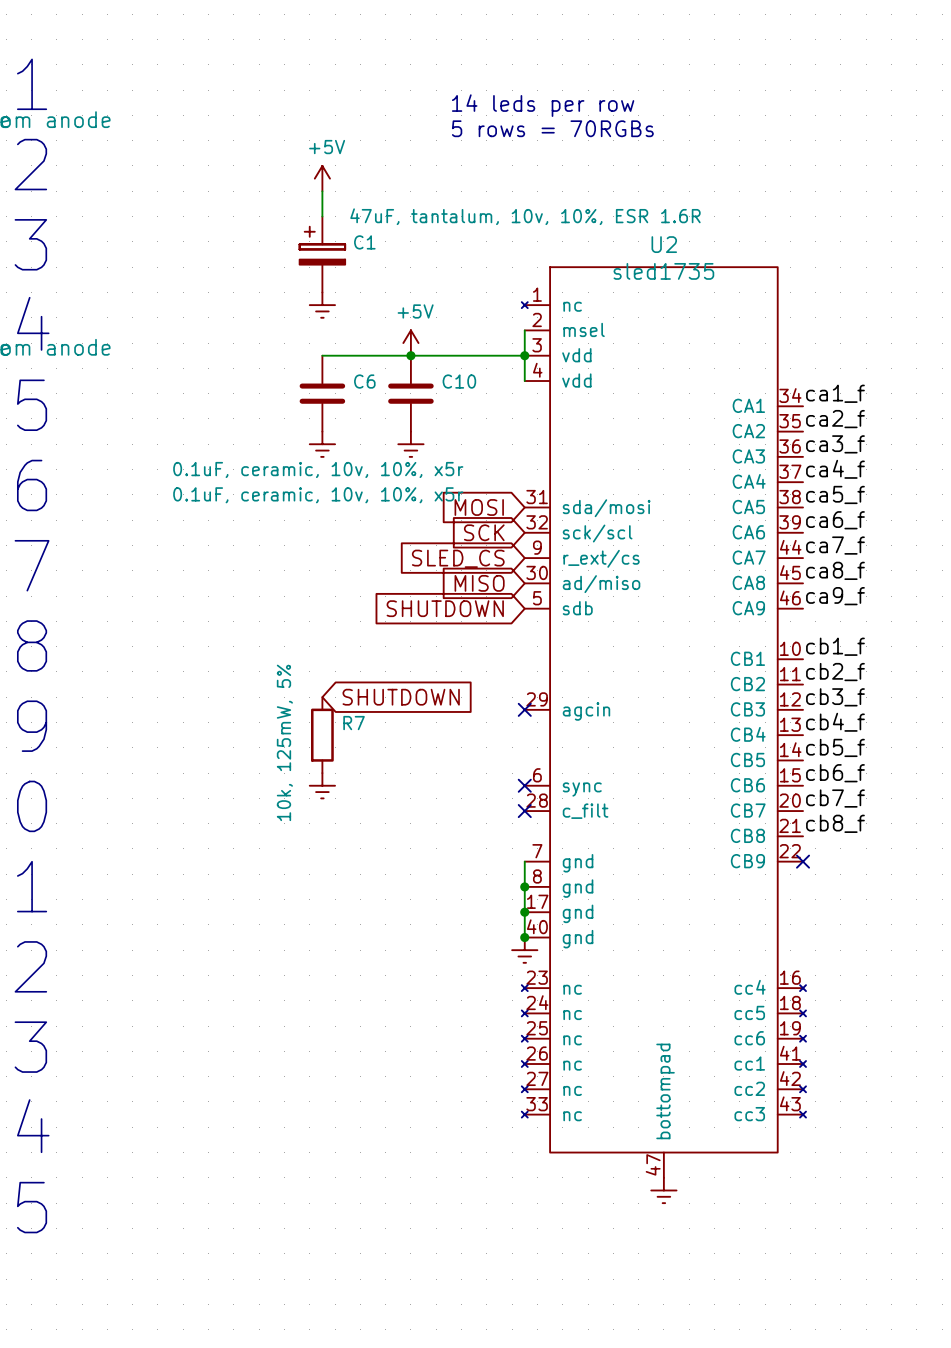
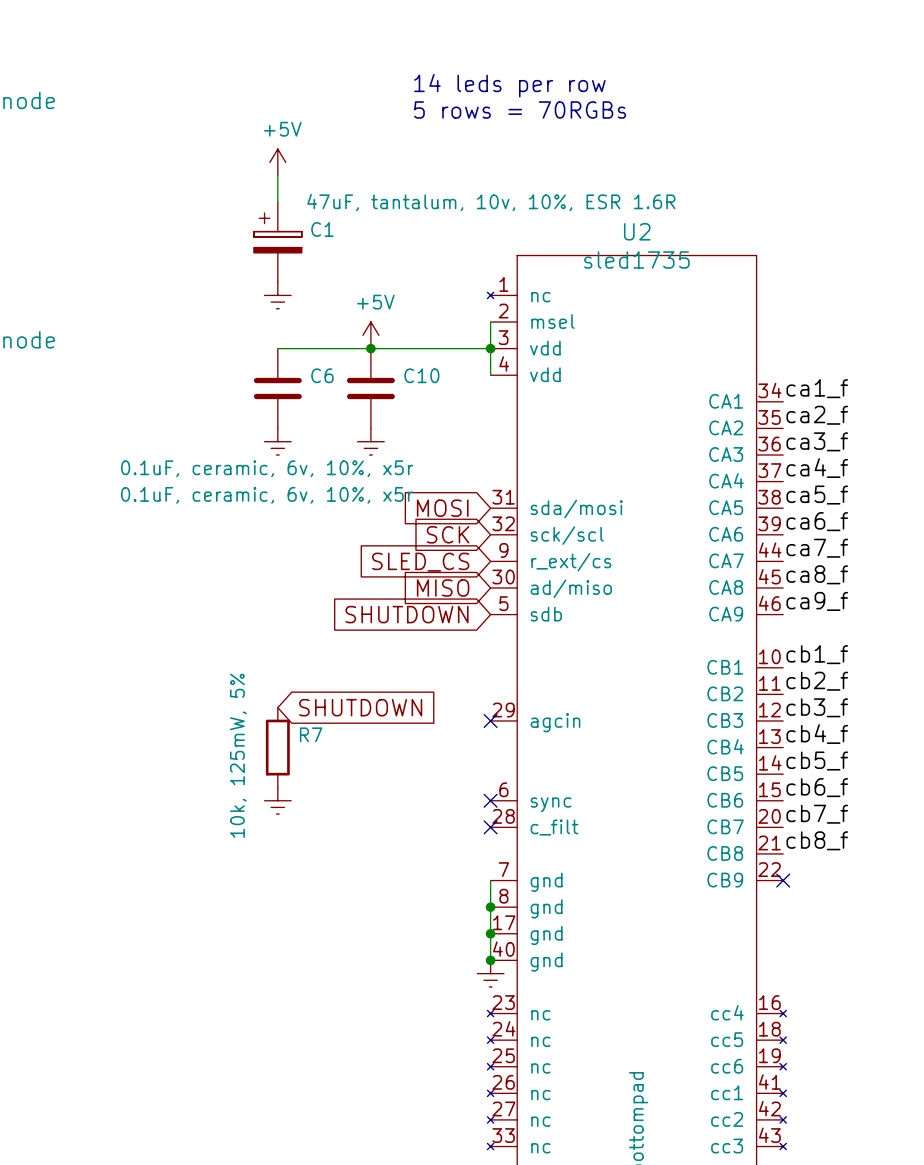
C6 value: 0.1uF, ceramic, 10v, 10%, x5r (318, 469) -> 0.1uF, ceramic, 6v, 10%, x5r (267, 468)
C10 value: 0.1uF, ceramic, 10v, 10%, x5r (318, 495) -> 0.1uF, ceramic, 6v, 10%, x5r (267, 495)

